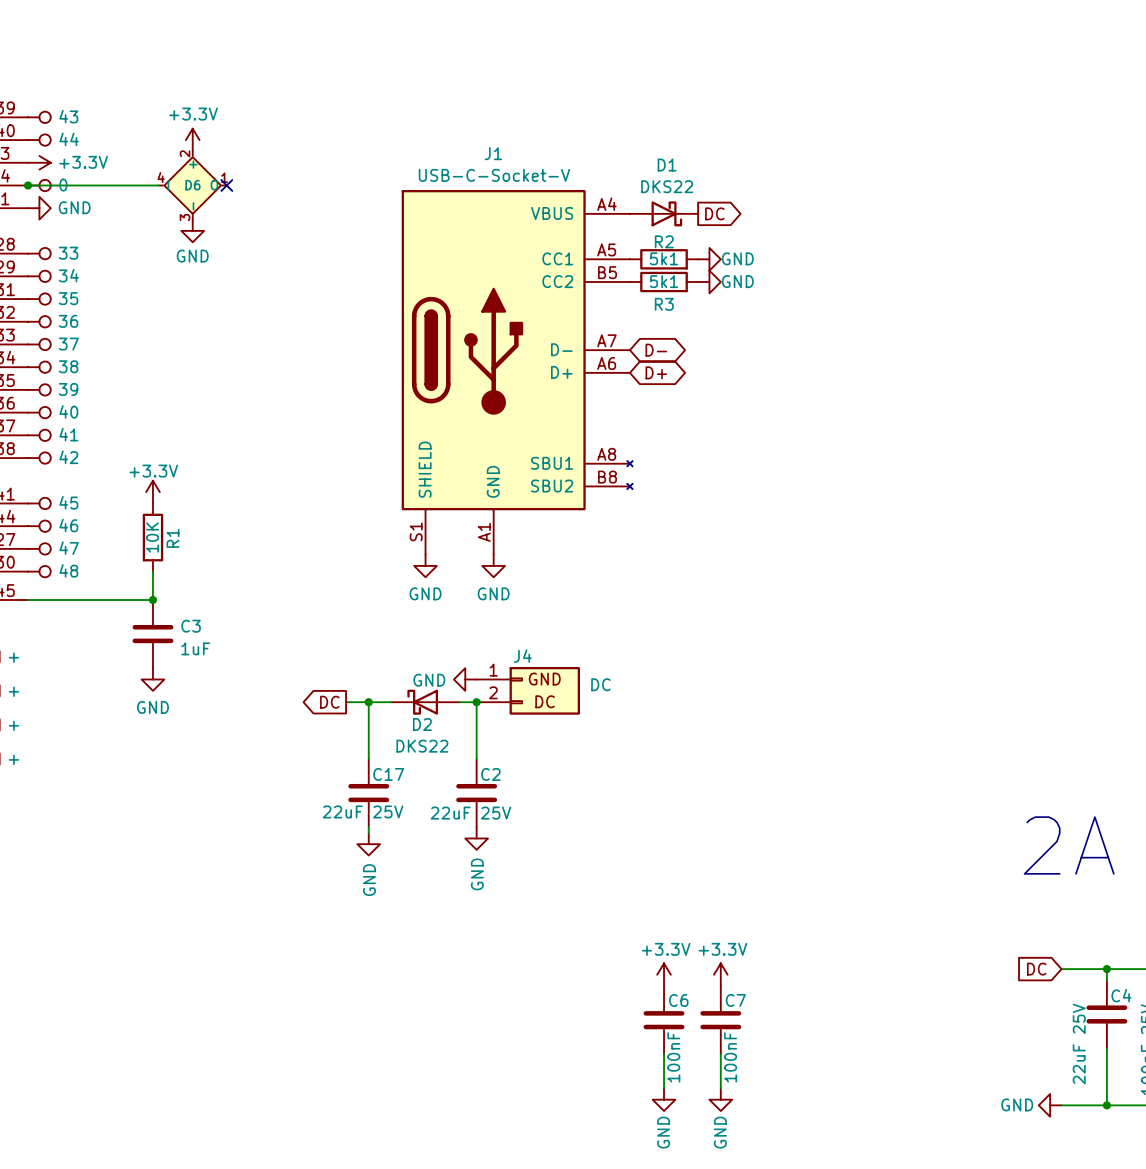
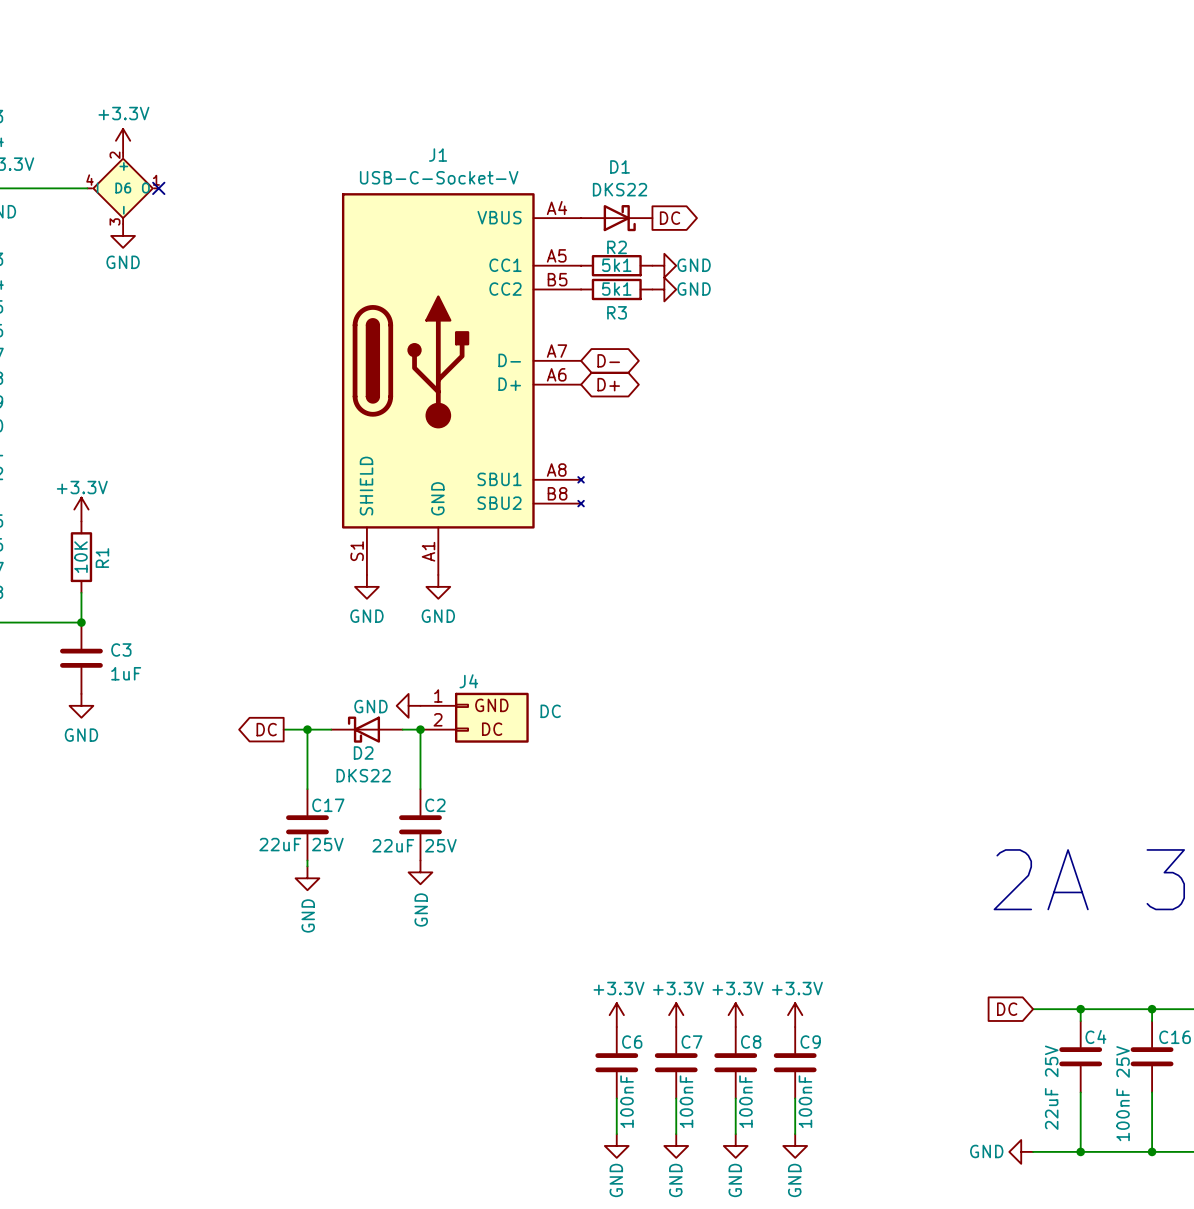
power symbol: none -> +3.3V (735, 1015)
power symbol: none -> +3.3V (795, 1015)
C8: none -> 100nF (735, 1062)
C9: none -> 100nF (795, 1062)
wire: none -> (735, 1098) (735, 1134)
wire: none -> (795, 1098) (795, 1134)
power symbol: none -> GND (735, 1145)
power symbol: none -> GND (795, 1145)

